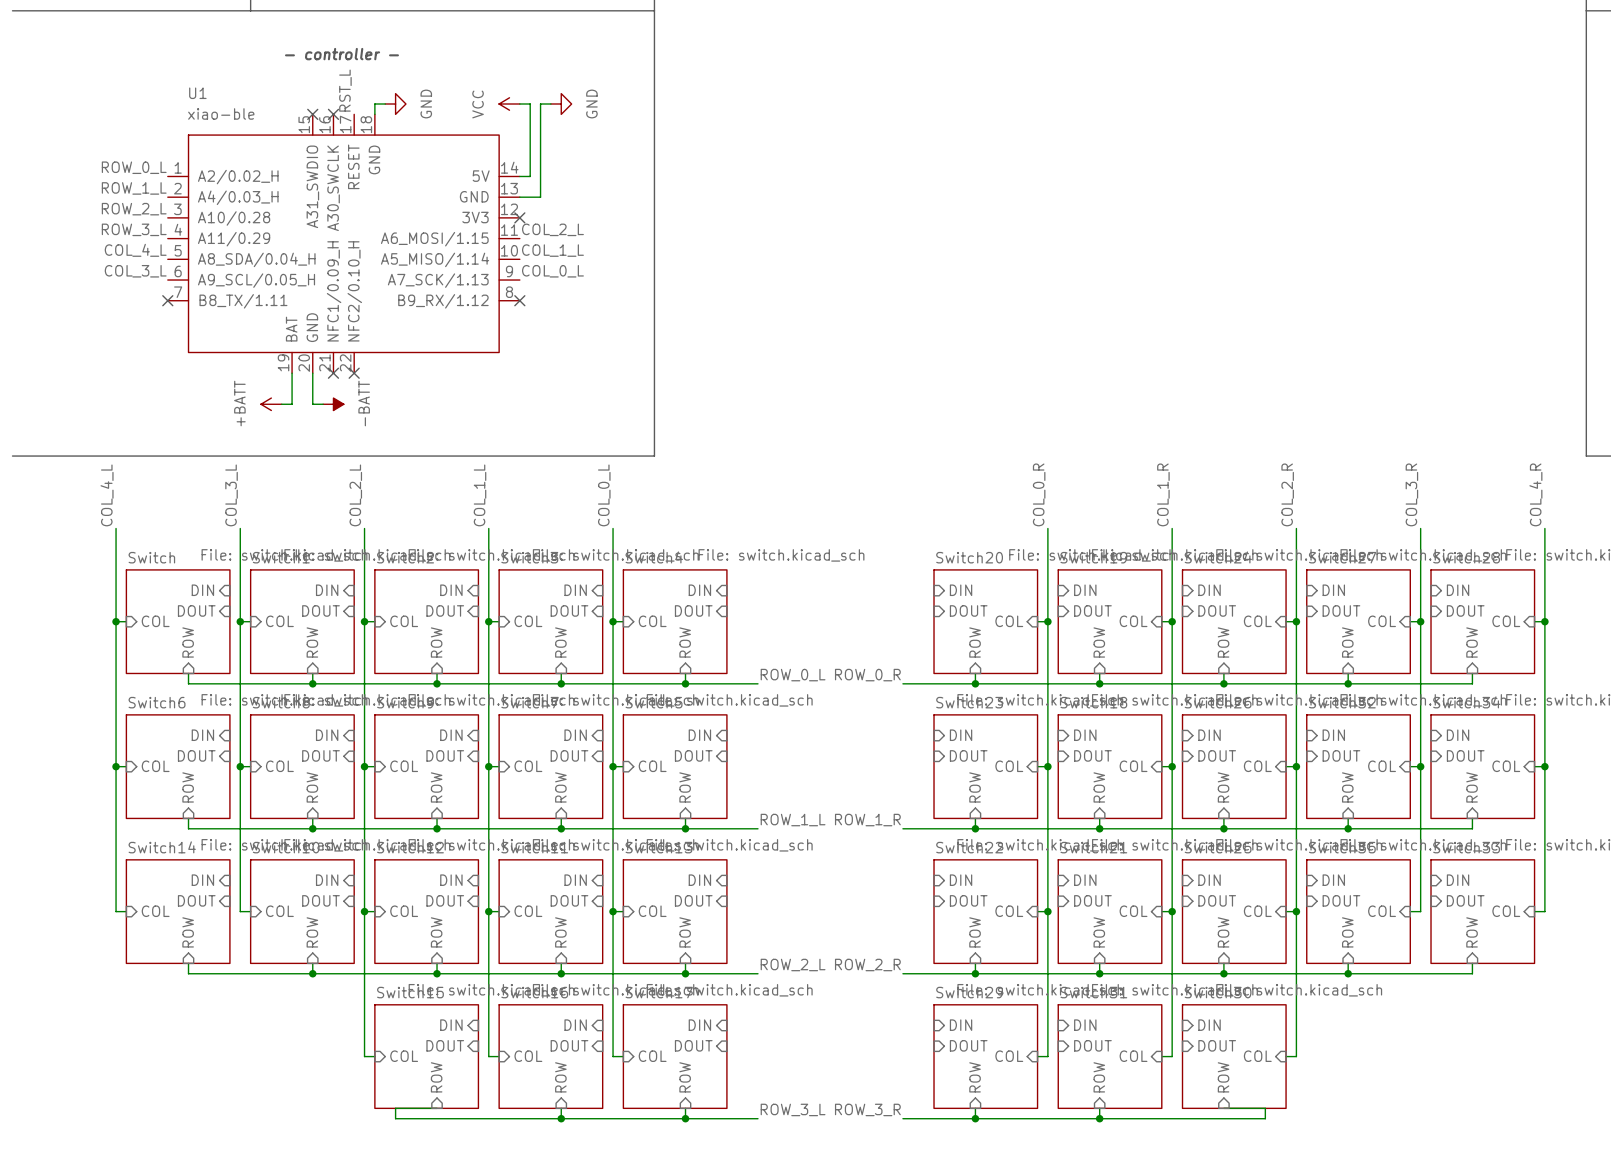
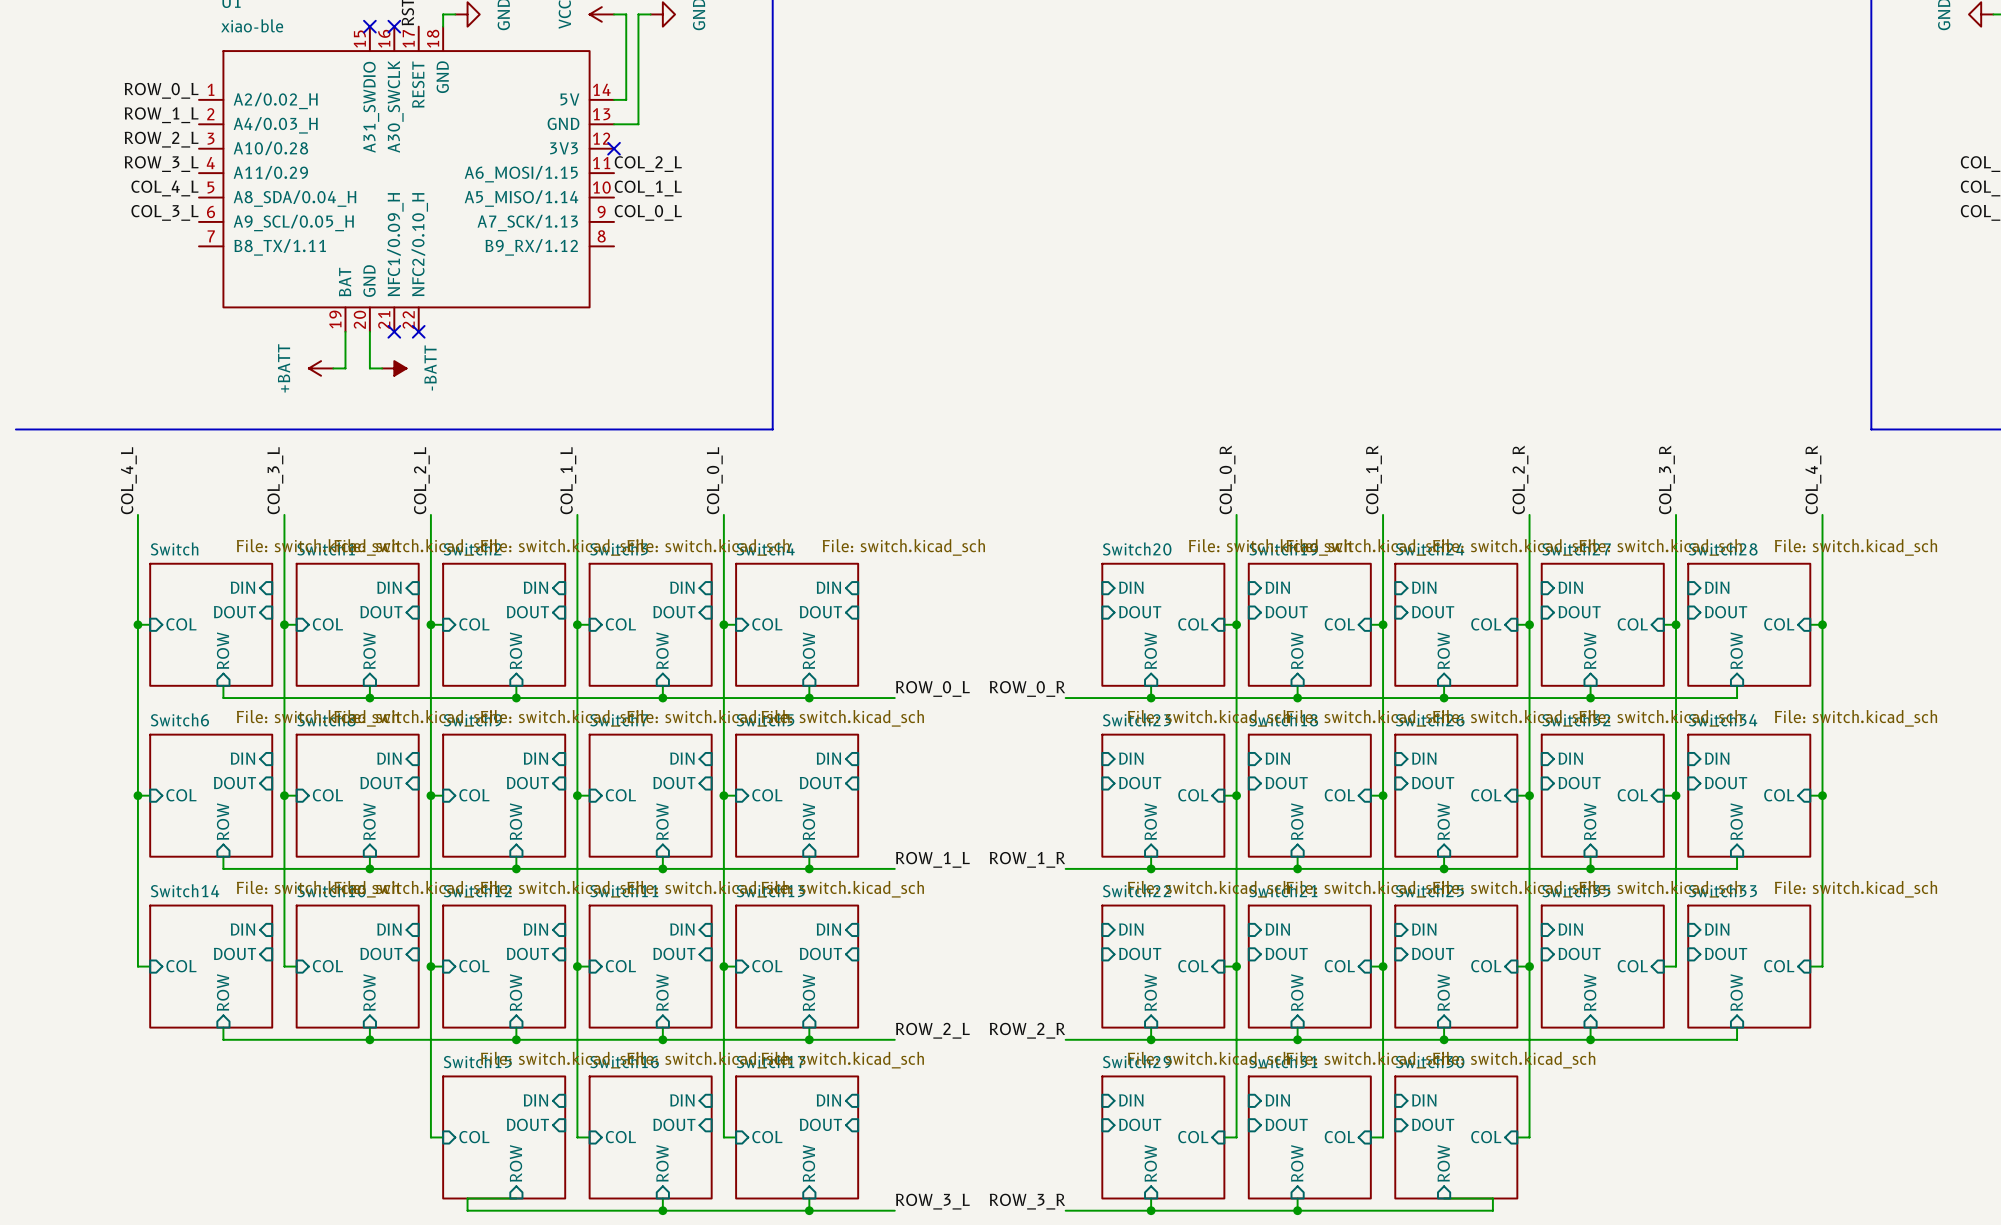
no-connect mark: (167, 300) -> none
no-connect mark: (519, 300) -> none

